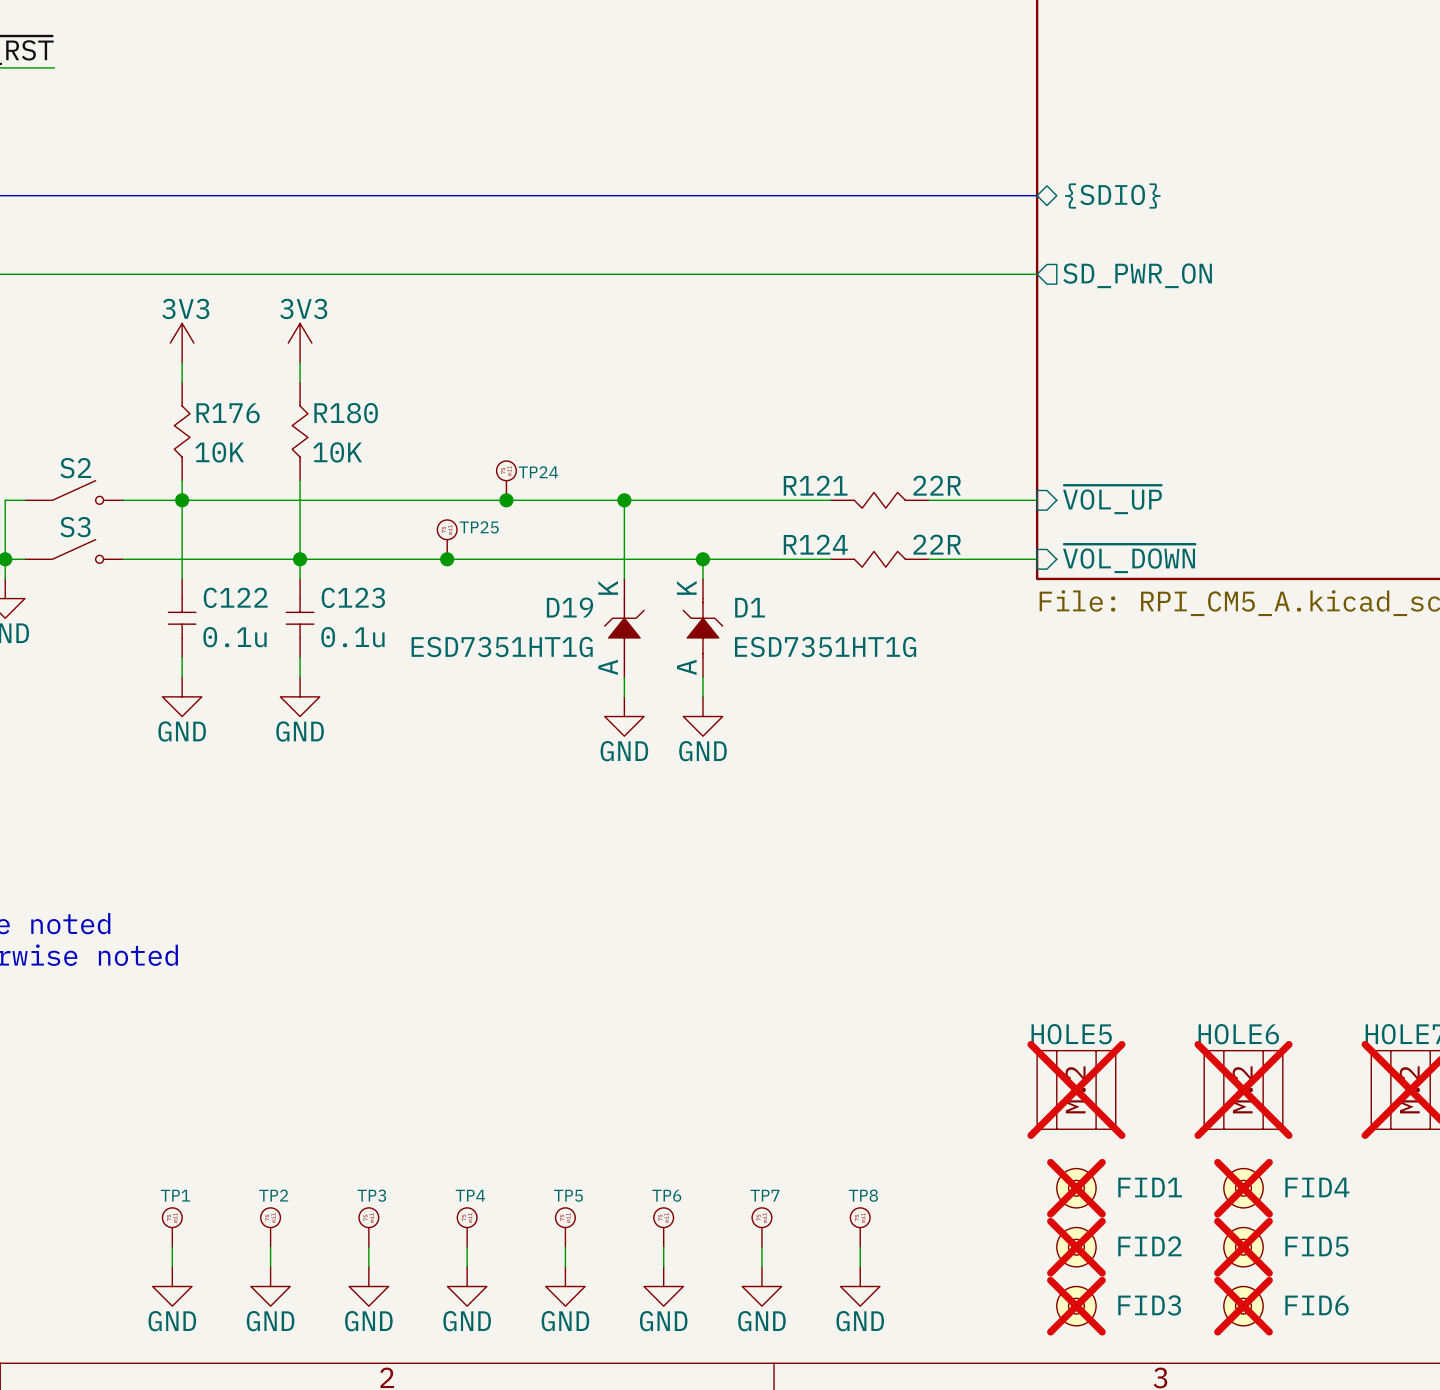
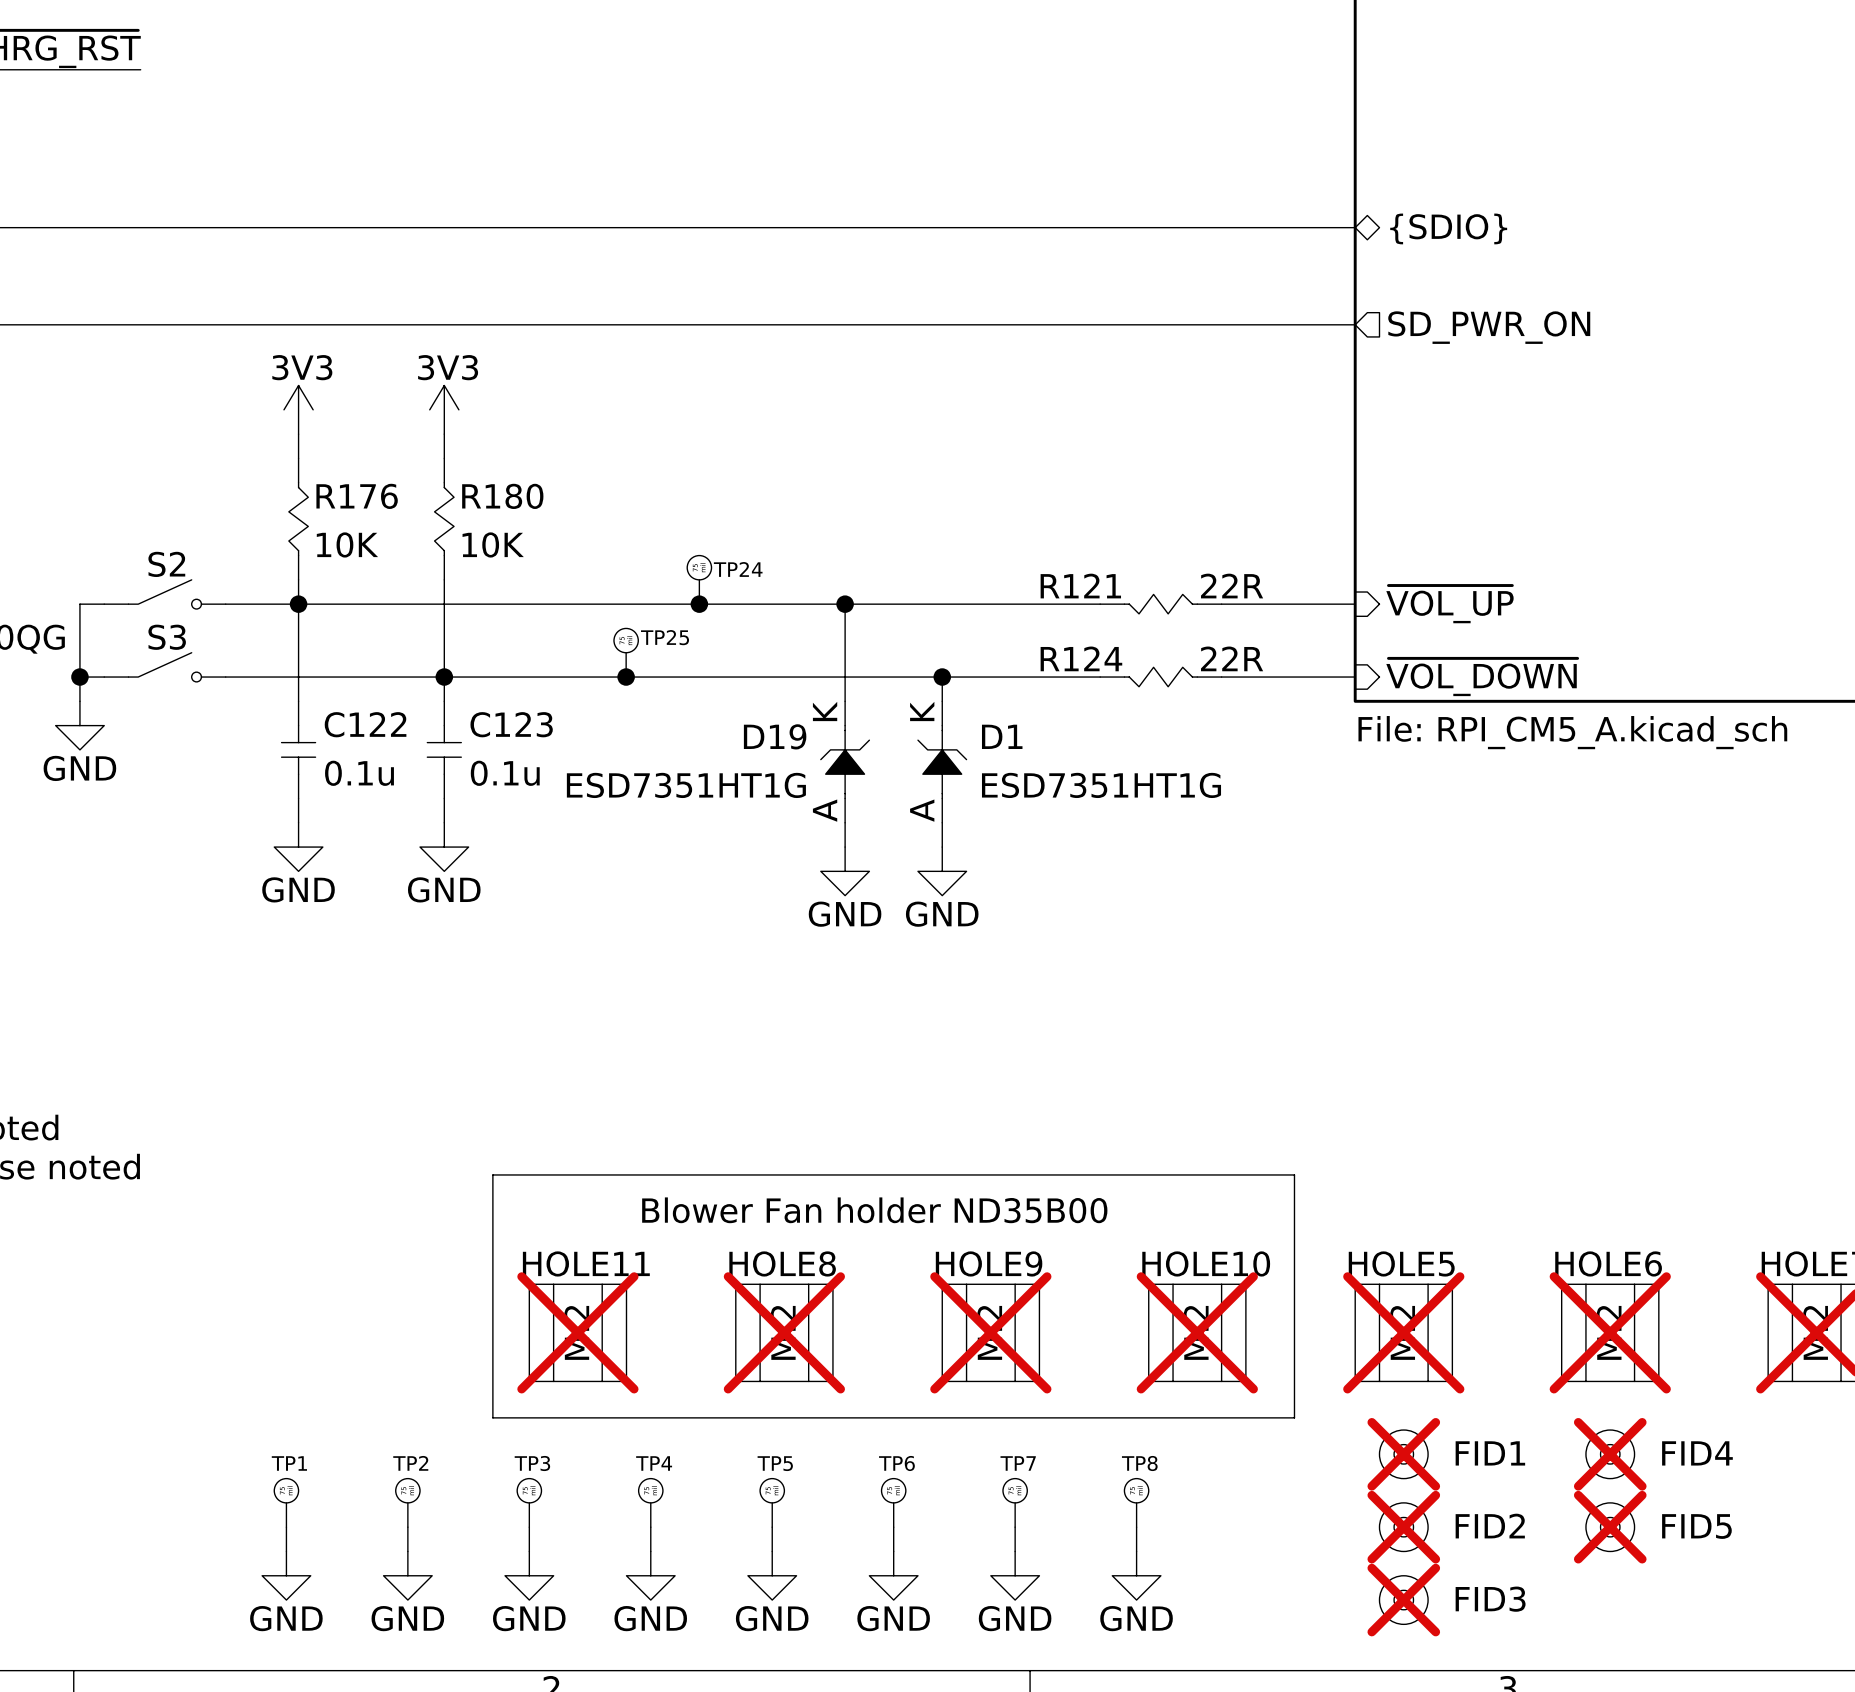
line: none -> (492, 1174) (1294, 1174) (1294, 1417) (492, 1417) (492, 1174)
text: none -> Blower Fan holder ND35B00 (874, 1210)
HOLE11: none -> (577, 1332)
HOLE8: none -> (784, 1332)
HOLE9: none -> (990, 1332)
HOLE10: none -> (1197, 1332)
FID6: (1243, 1306) -> none

